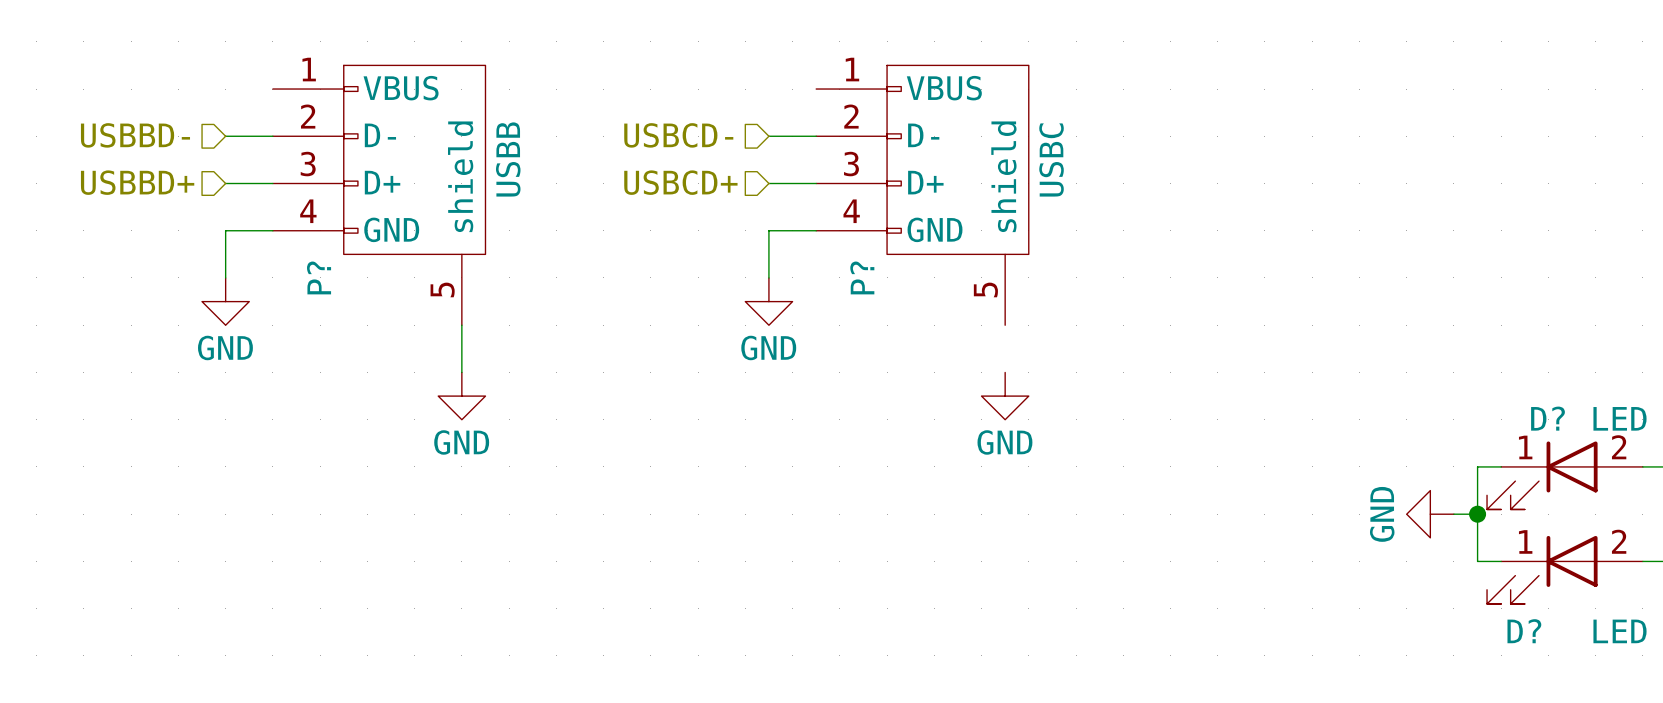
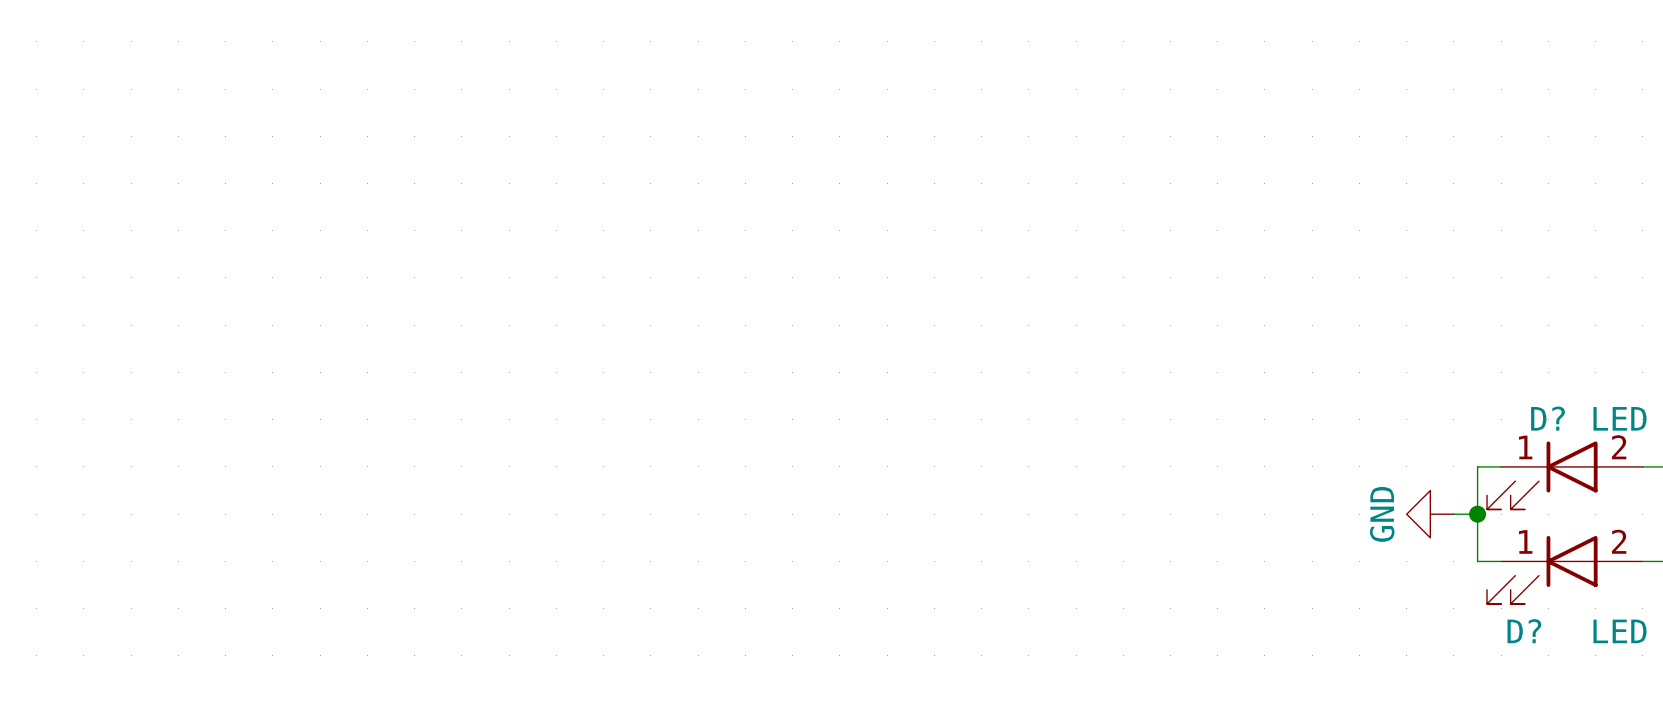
hierarchical label: USBBD- (135, 135) -> none
hierarchical label: USBCD- (678, 135) -> none
wire: (225, 136) (272, 136) -> none
wire: (768, 136) (816, 136) -> none
hierarchical label: USBBD+ (137, 182) -> none
hierarchical label: USBCD+ (680, 182) -> none
wire: (225, 183) (272, 183) -> none
wire: (768, 183) (816, 183) -> none
P?: USBB (379, 195) -> none
P?: USBC (922, 195) -> none
wire: (272, 230) (225, 230) (225, 277) -> none
wire: (816, 230) (768, 230) (768, 277) -> none
power symbol: GND (225, 301) -> none
power symbol: GND (768, 301) -> none
wire: (461, 325) (461, 372) -> none
power symbol: GND (461, 396) -> none
power symbol: GND (1005, 396) -> none

